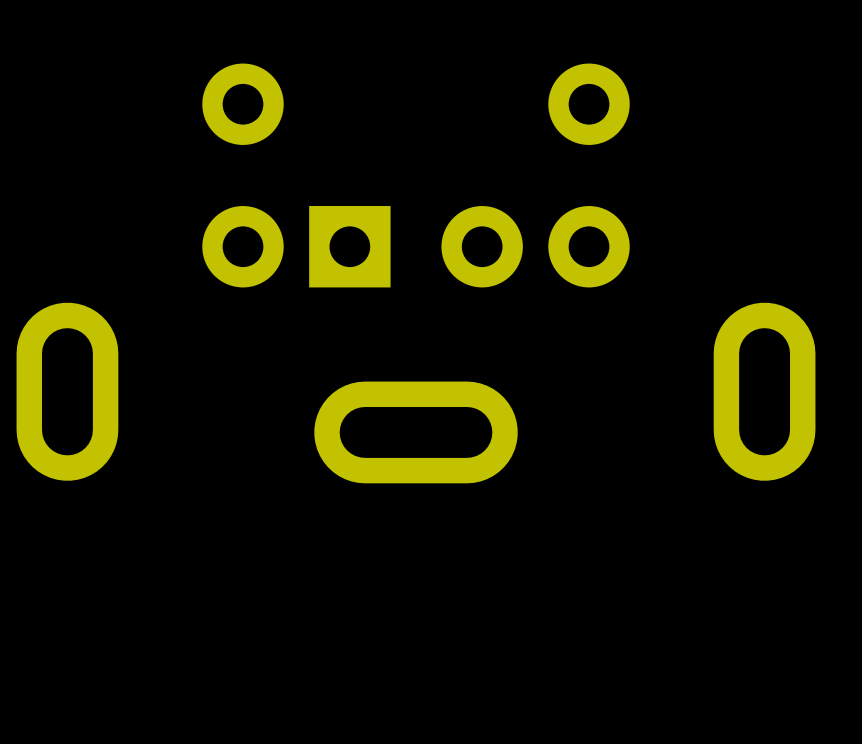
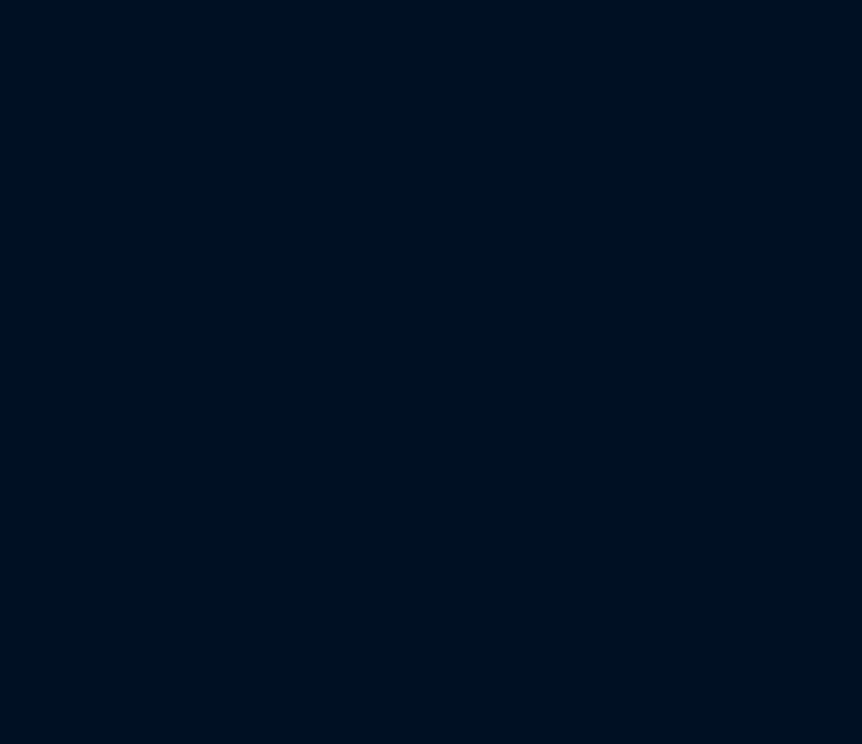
part: (416, 273) -> none

